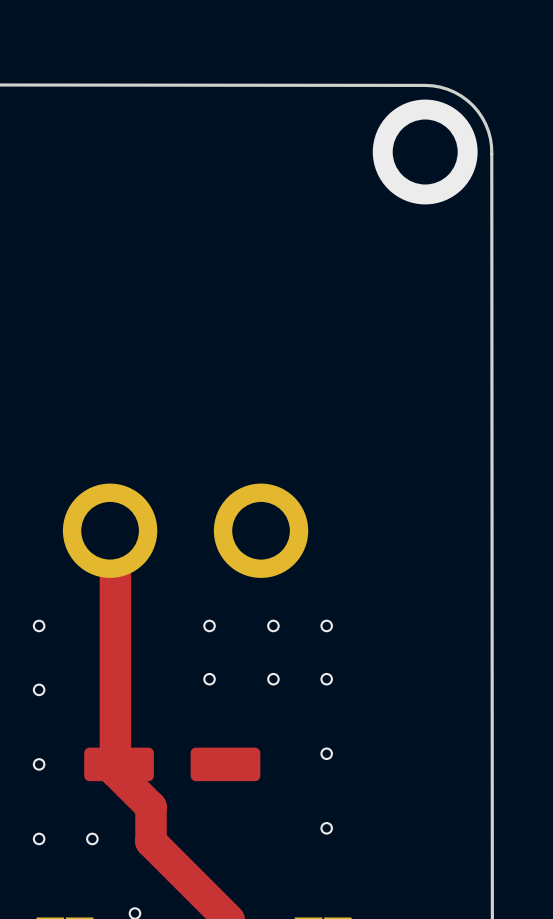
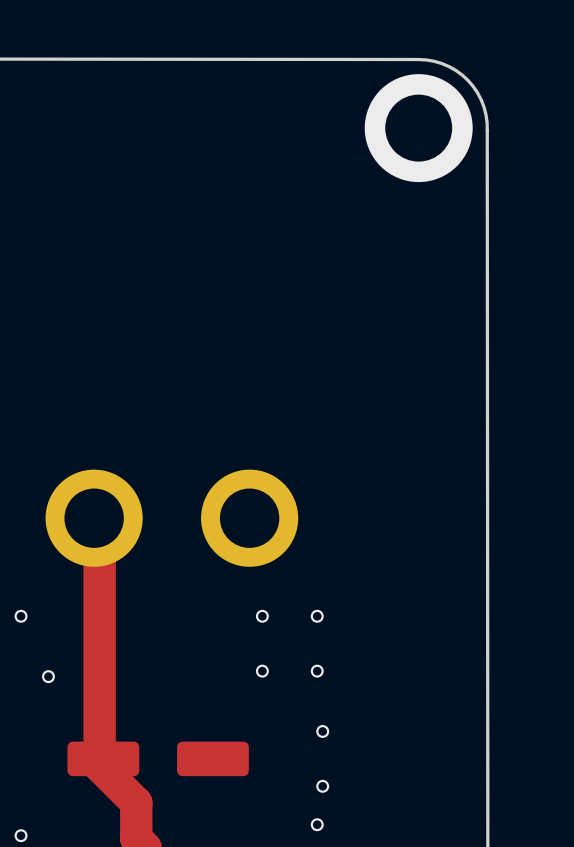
via: (209, 625) -> none
via: (209, 679) -> none
via position: (39, 689) -> (48, 676)
via position: (326, 753) -> (322, 731)
via: (39, 764) -> none
via: none -> (322, 786)
via: (92, 838) -> none

